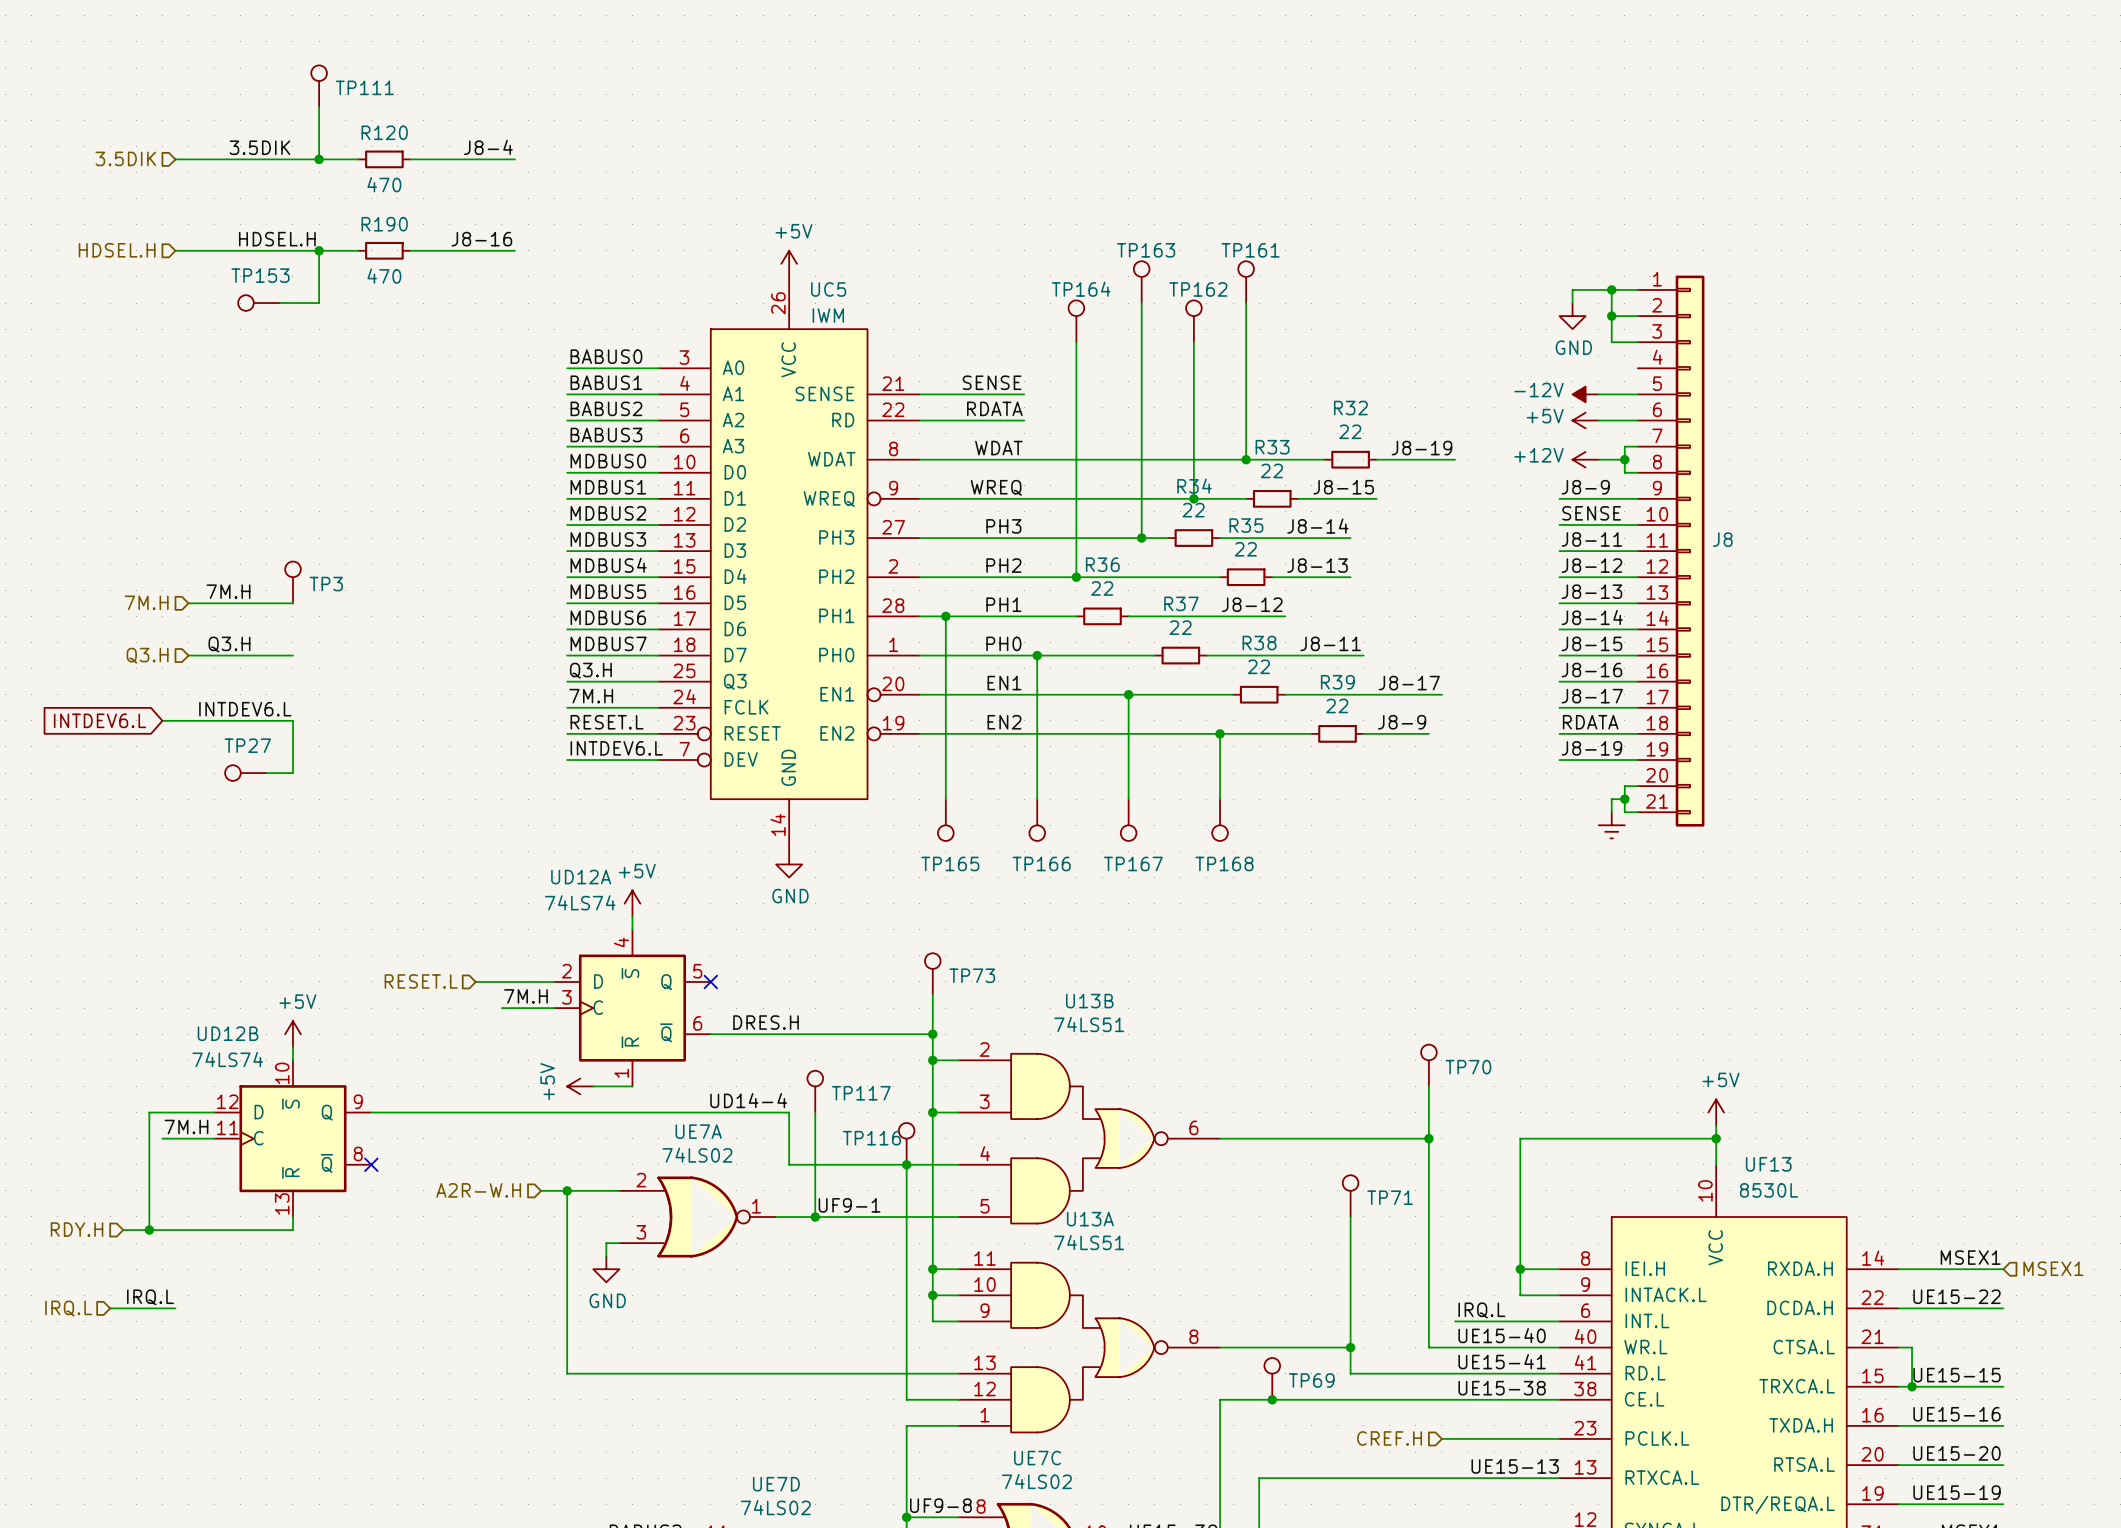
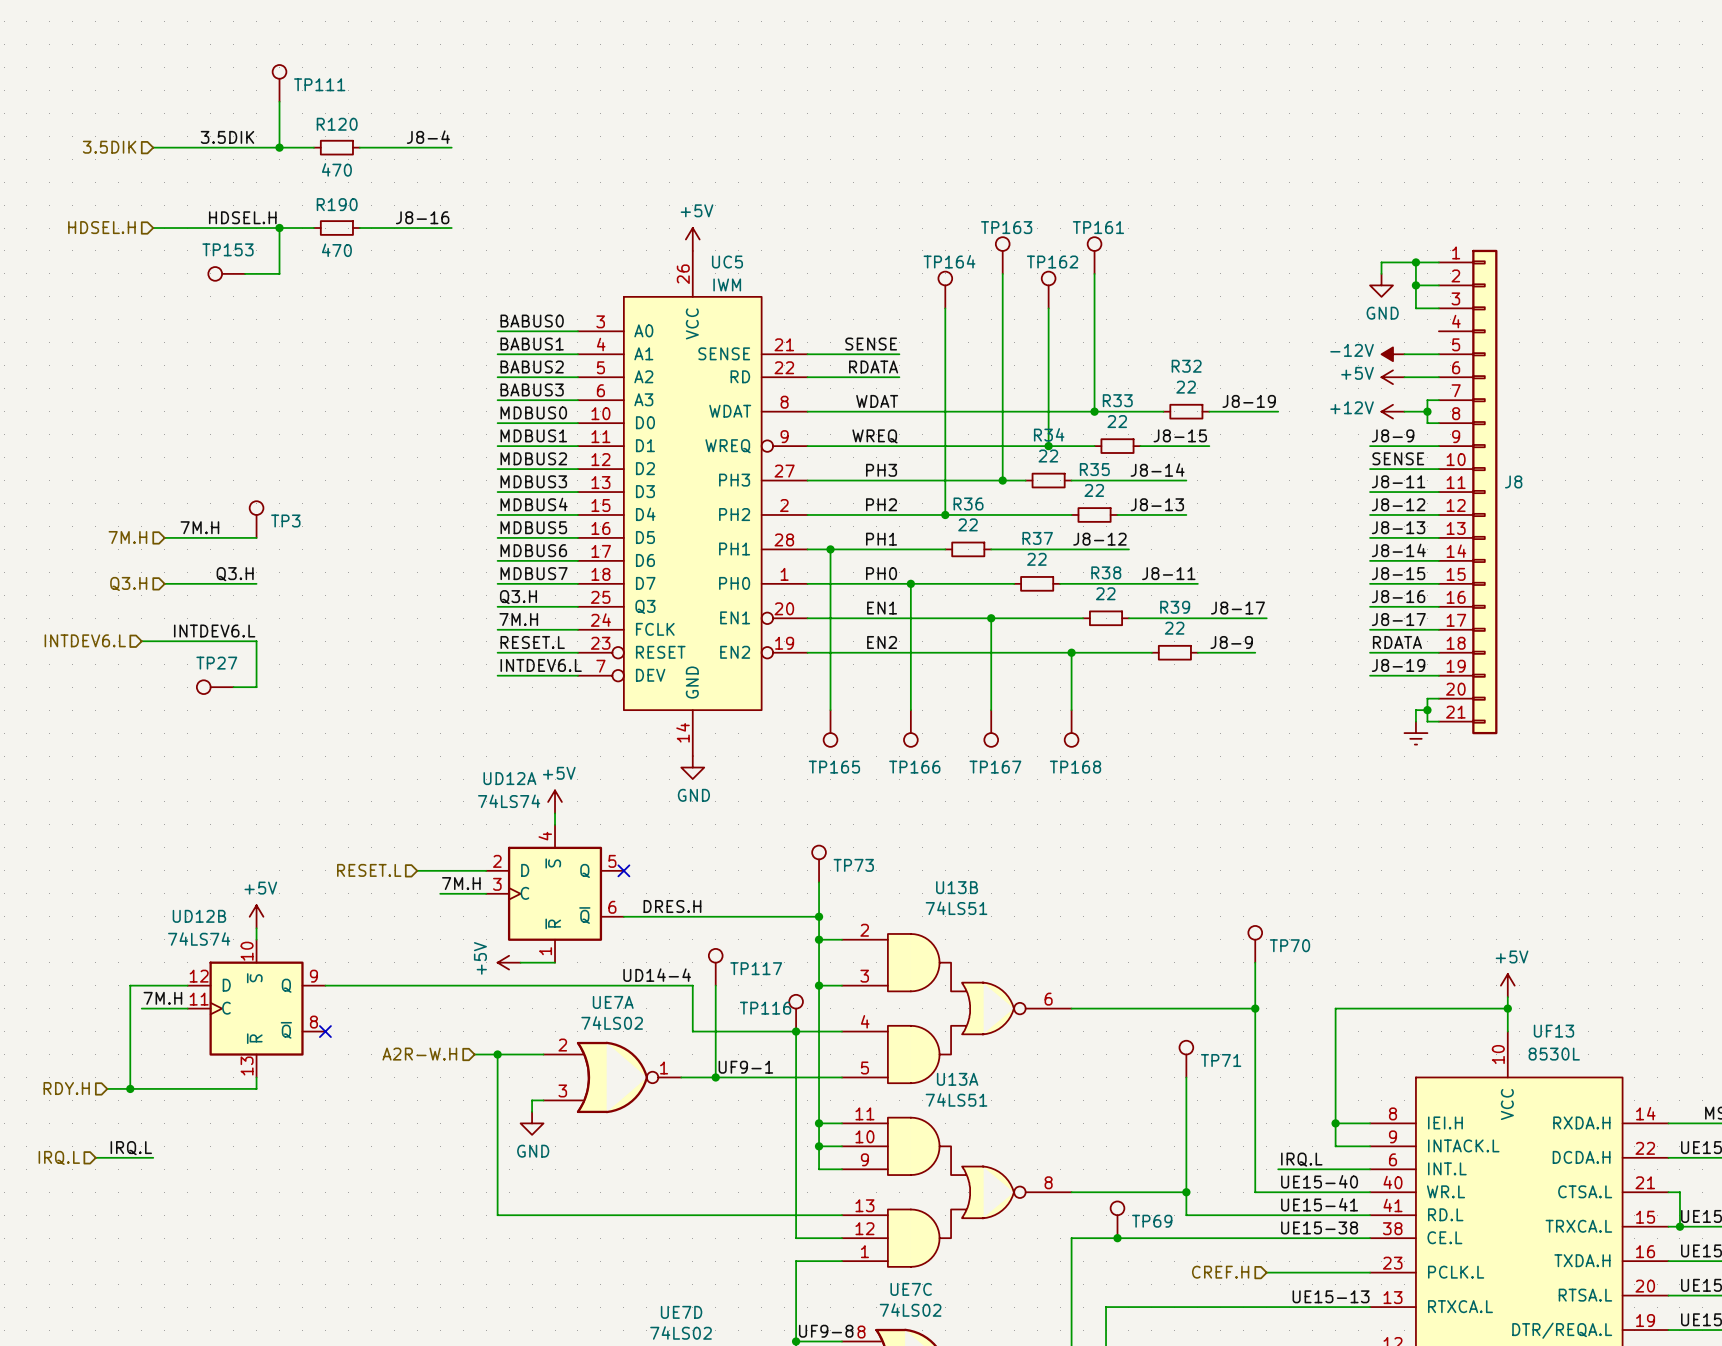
label position: Q3.H (229, 644) -> Q3.H (235, 574)
hierarchical label: none -> INTDEV6.L (85, 640)
global label: INTDEV6.L (100, 720) -> none

